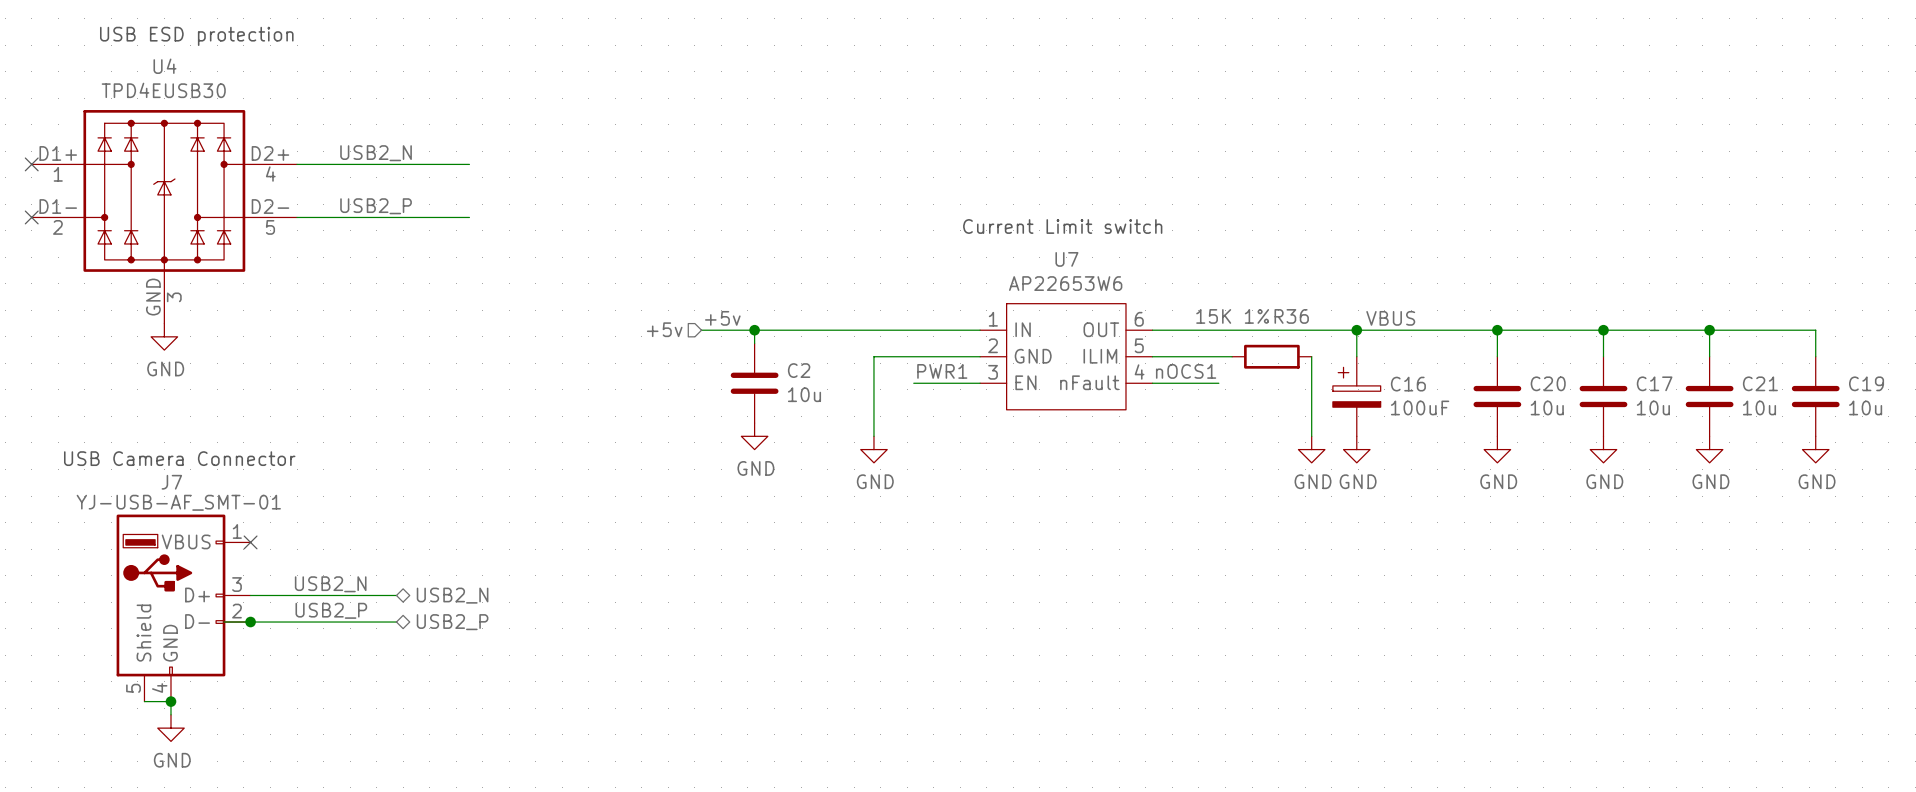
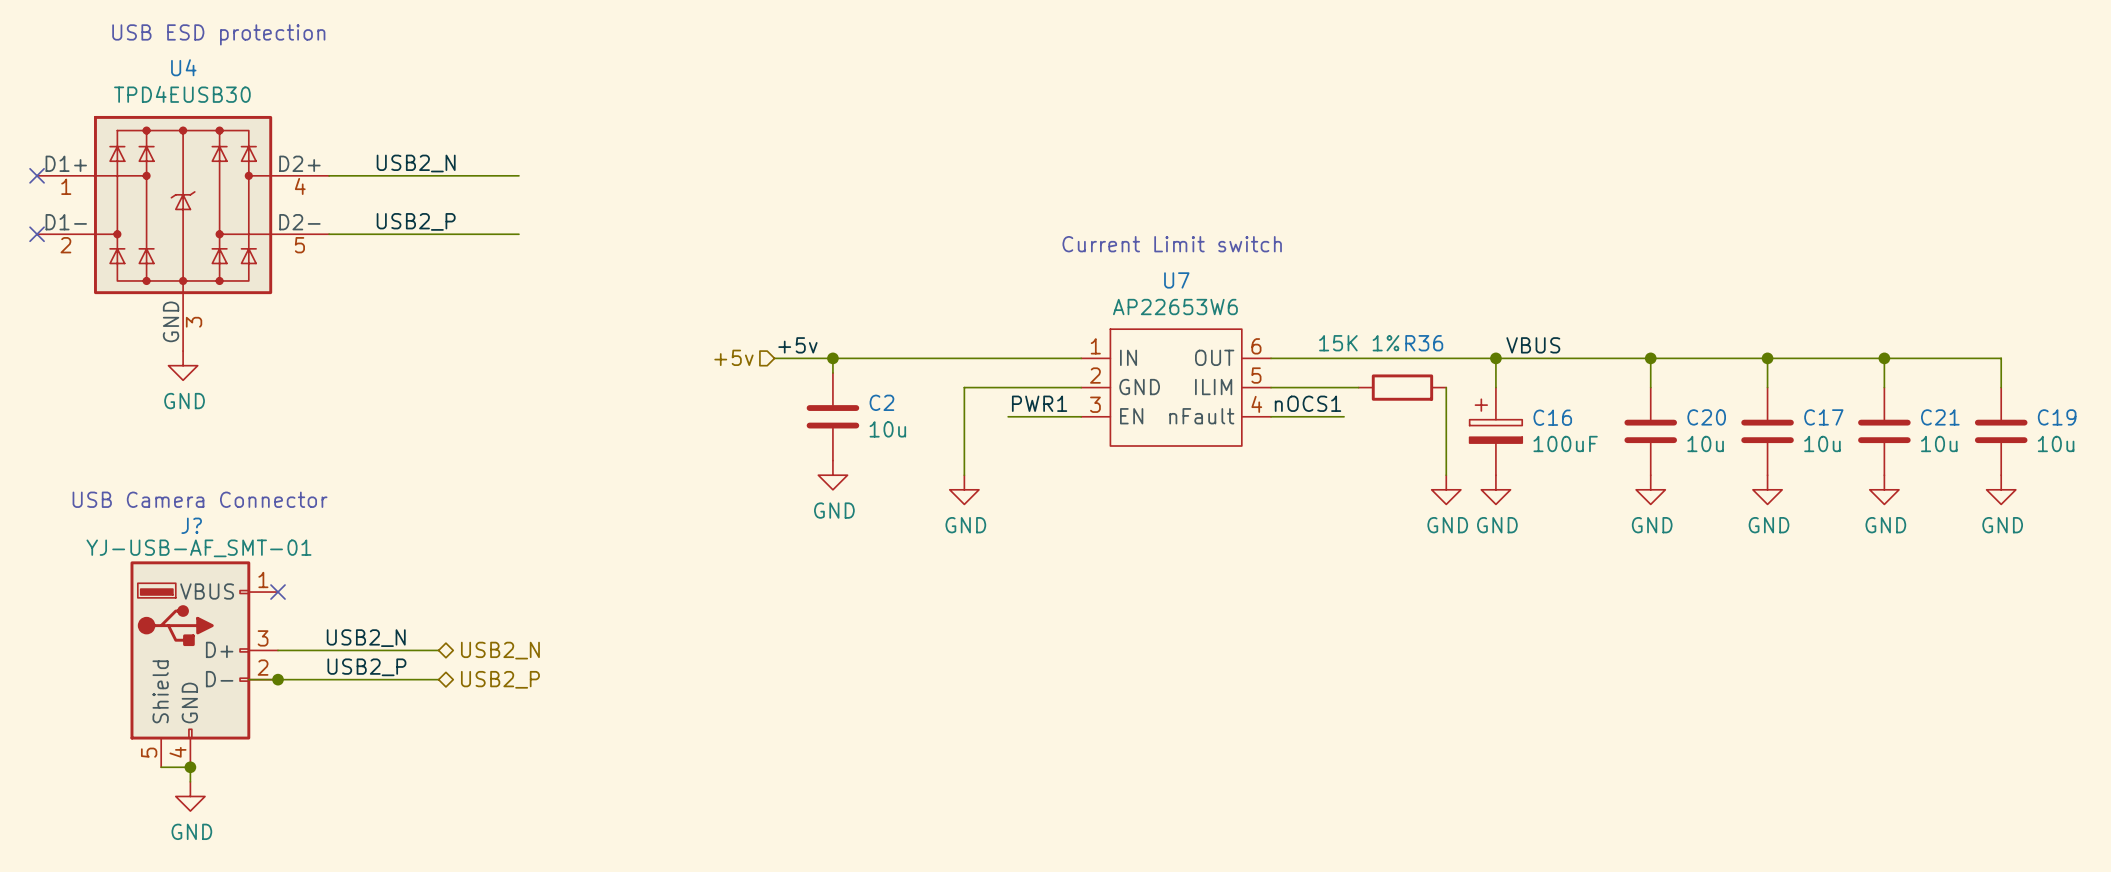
J7 name: J7 (171, 482) -> J? (191, 525)

